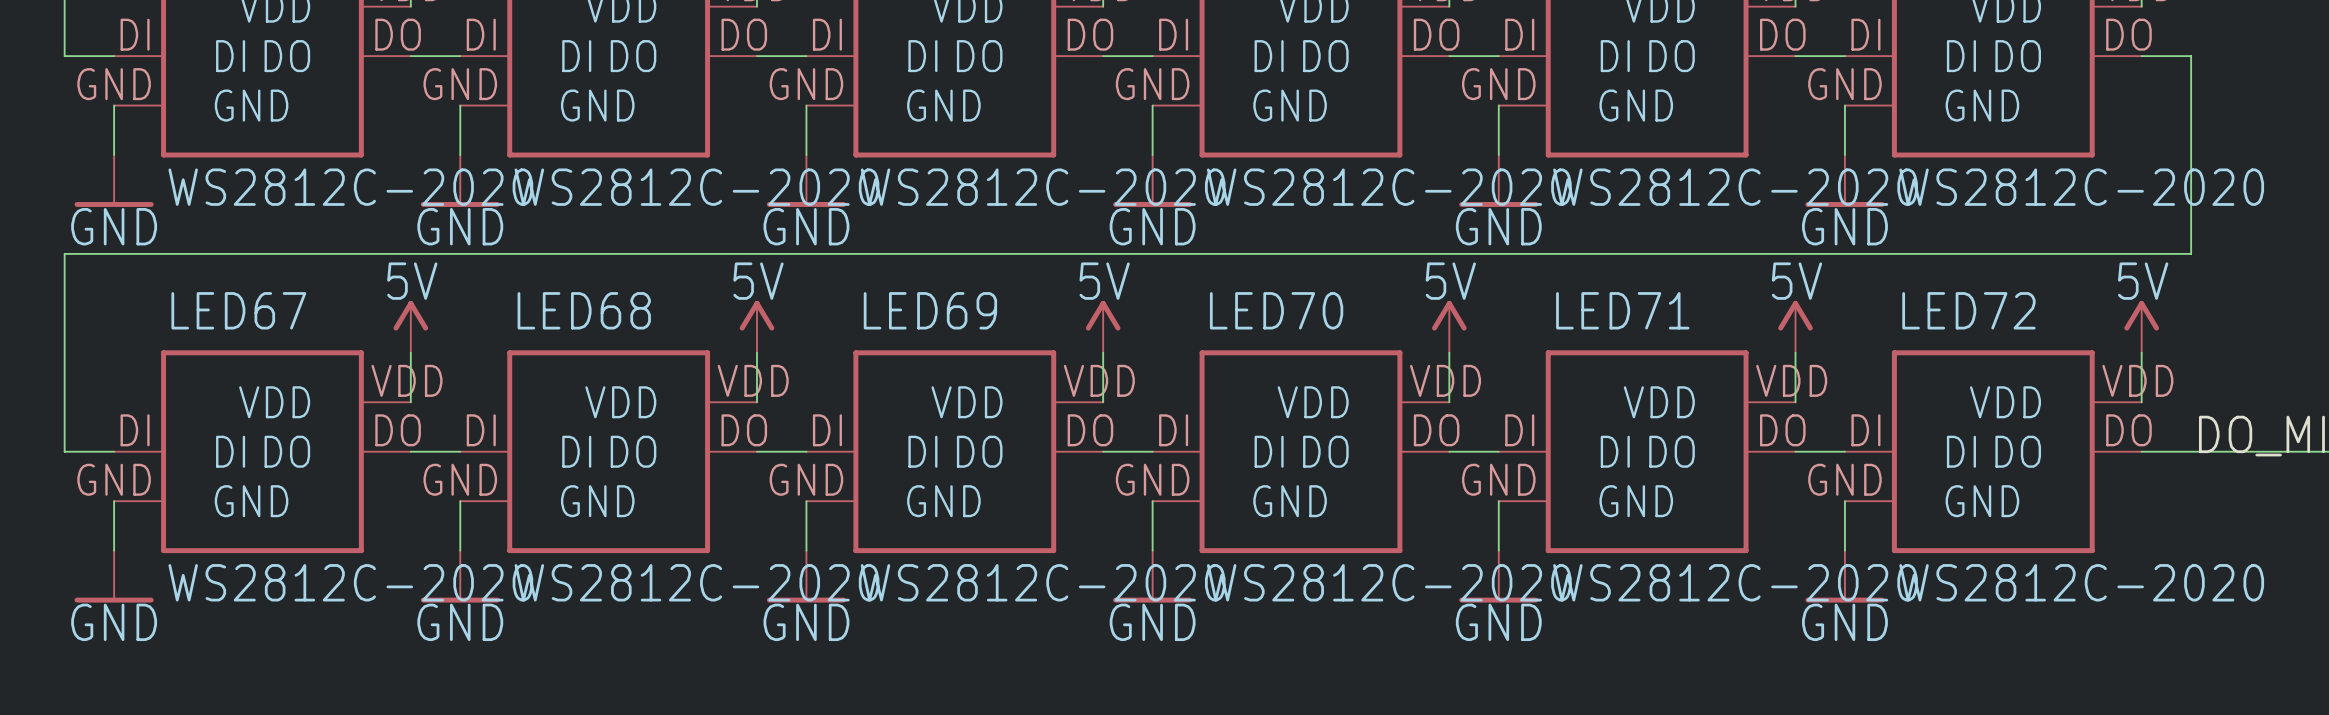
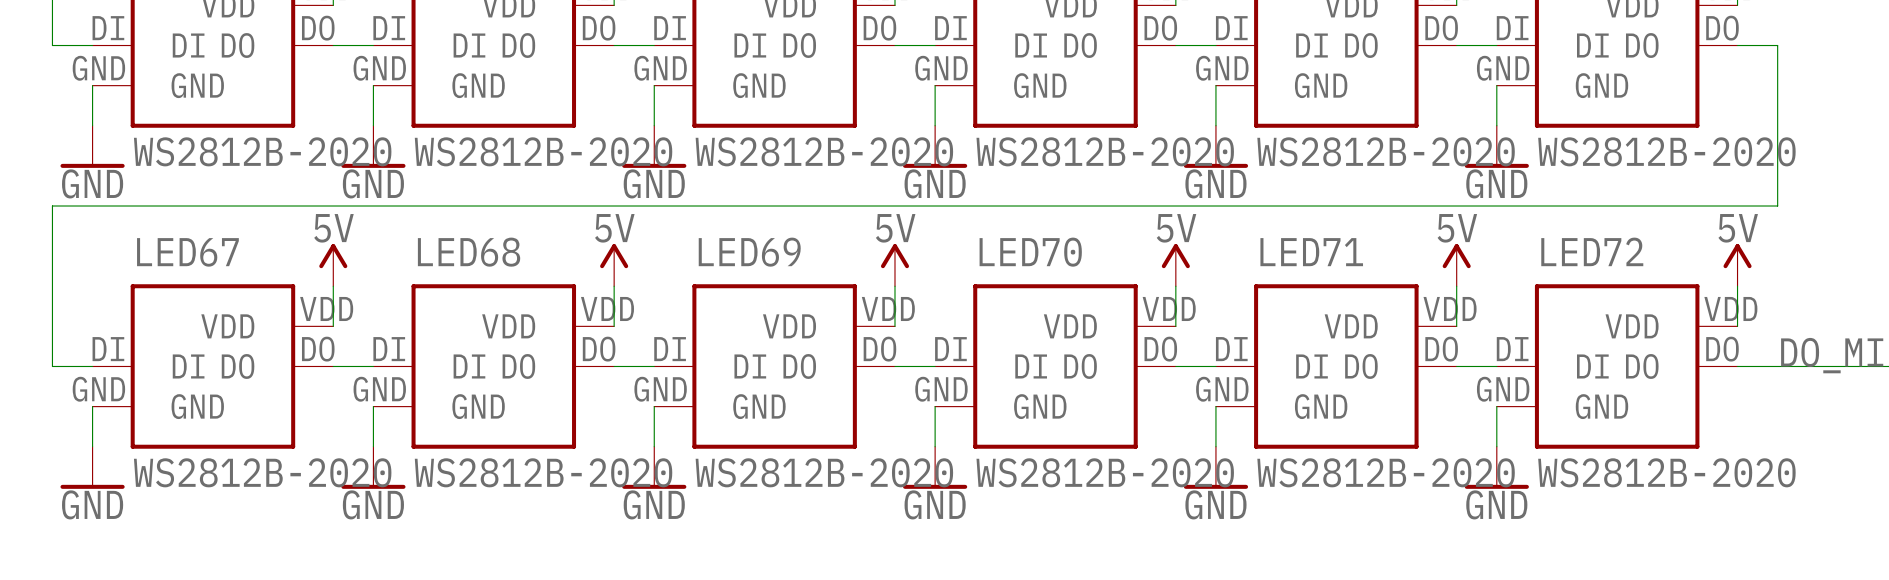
part value: WS2812C-2020 (350, 187) -> WS2812B-2020 (262, 151)
part value: WS2812C-2020 (697, 187) -> WS2812B-2020 (543, 151)
part value: WS2812C-2020 (1043, 187) -> WS2812B-2020 (824, 151)
part value: WS2812C-2020 (1389, 187) -> WS2812B-2020 (1105, 151)
part value: WS2812C-2020 (1735, 187) -> WS2812B-2020 (1386, 151)
part value: WS2812C-2020 (2081, 187) -> WS2812B-2020 (1666, 151)
LED67 value: WS2812C-2020 (350, 582) -> WS2812B-2020 (262, 472)
LED68 value: WS2812C-2020 (697, 582) -> WS2812B-2020 (543, 472)
LED69 value: WS2812C-2020 (1043, 582) -> WS2812B-2020 (824, 472)
LED70 value: WS2812C-2020 (1389, 582) -> WS2812B-2020 (1105, 472)
LED71 value: WS2812C-2020 (1735, 582) -> WS2812B-2020 (1386, 472)
LED72 value: WS2812C-2020 (2081, 582) -> WS2812B-2020 (1666, 472)

